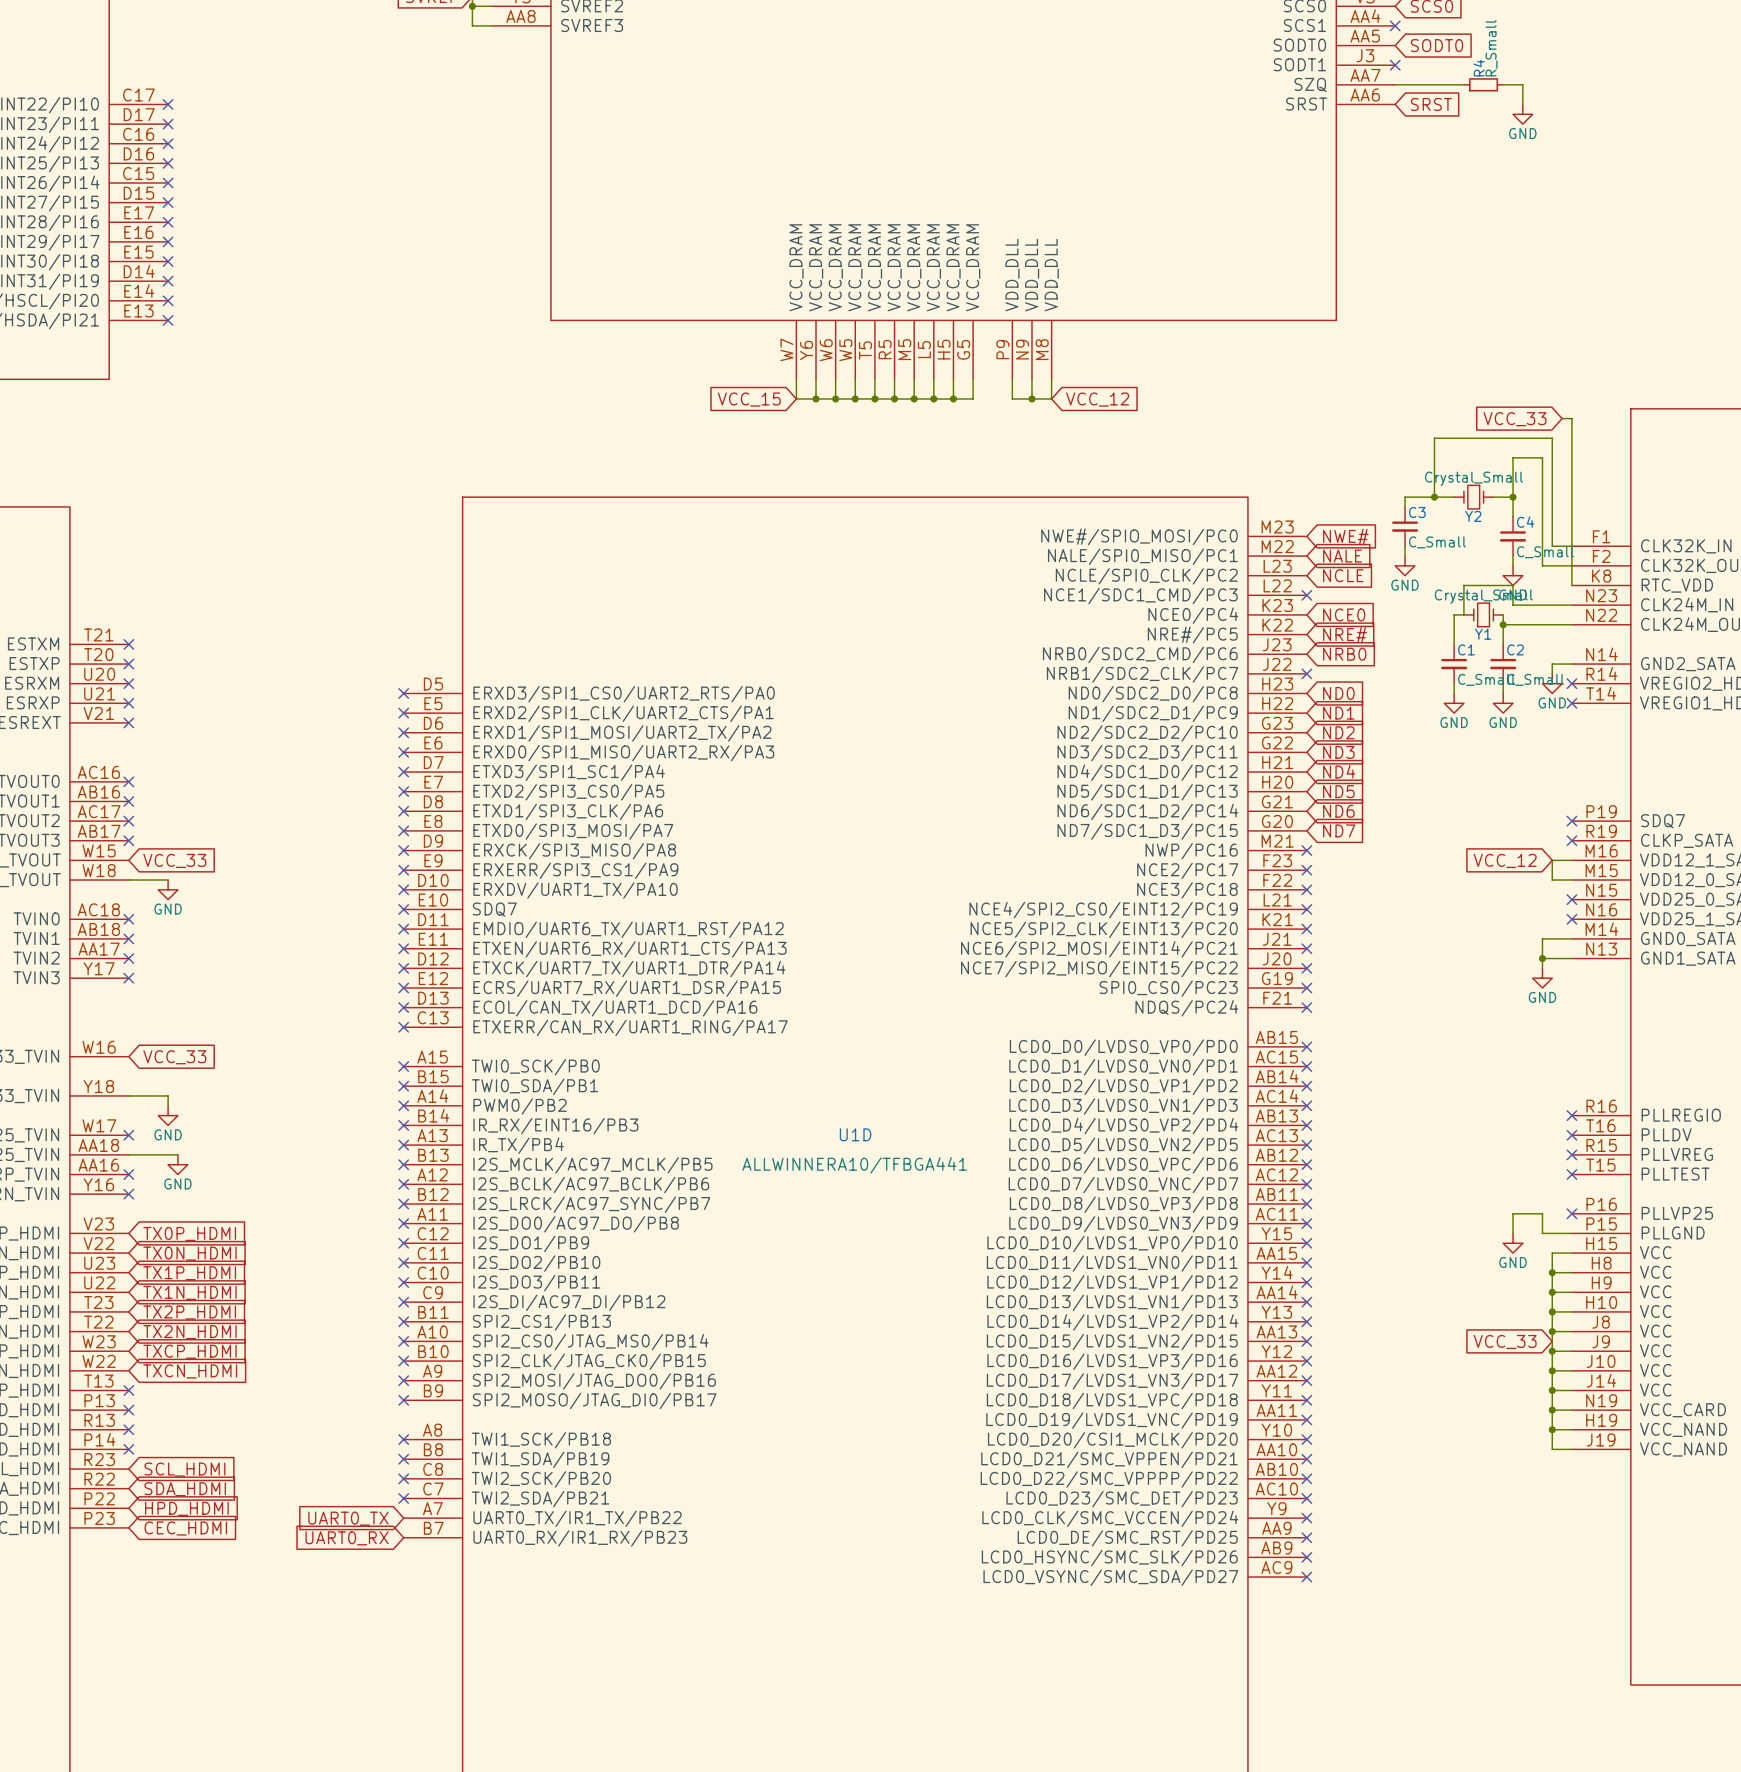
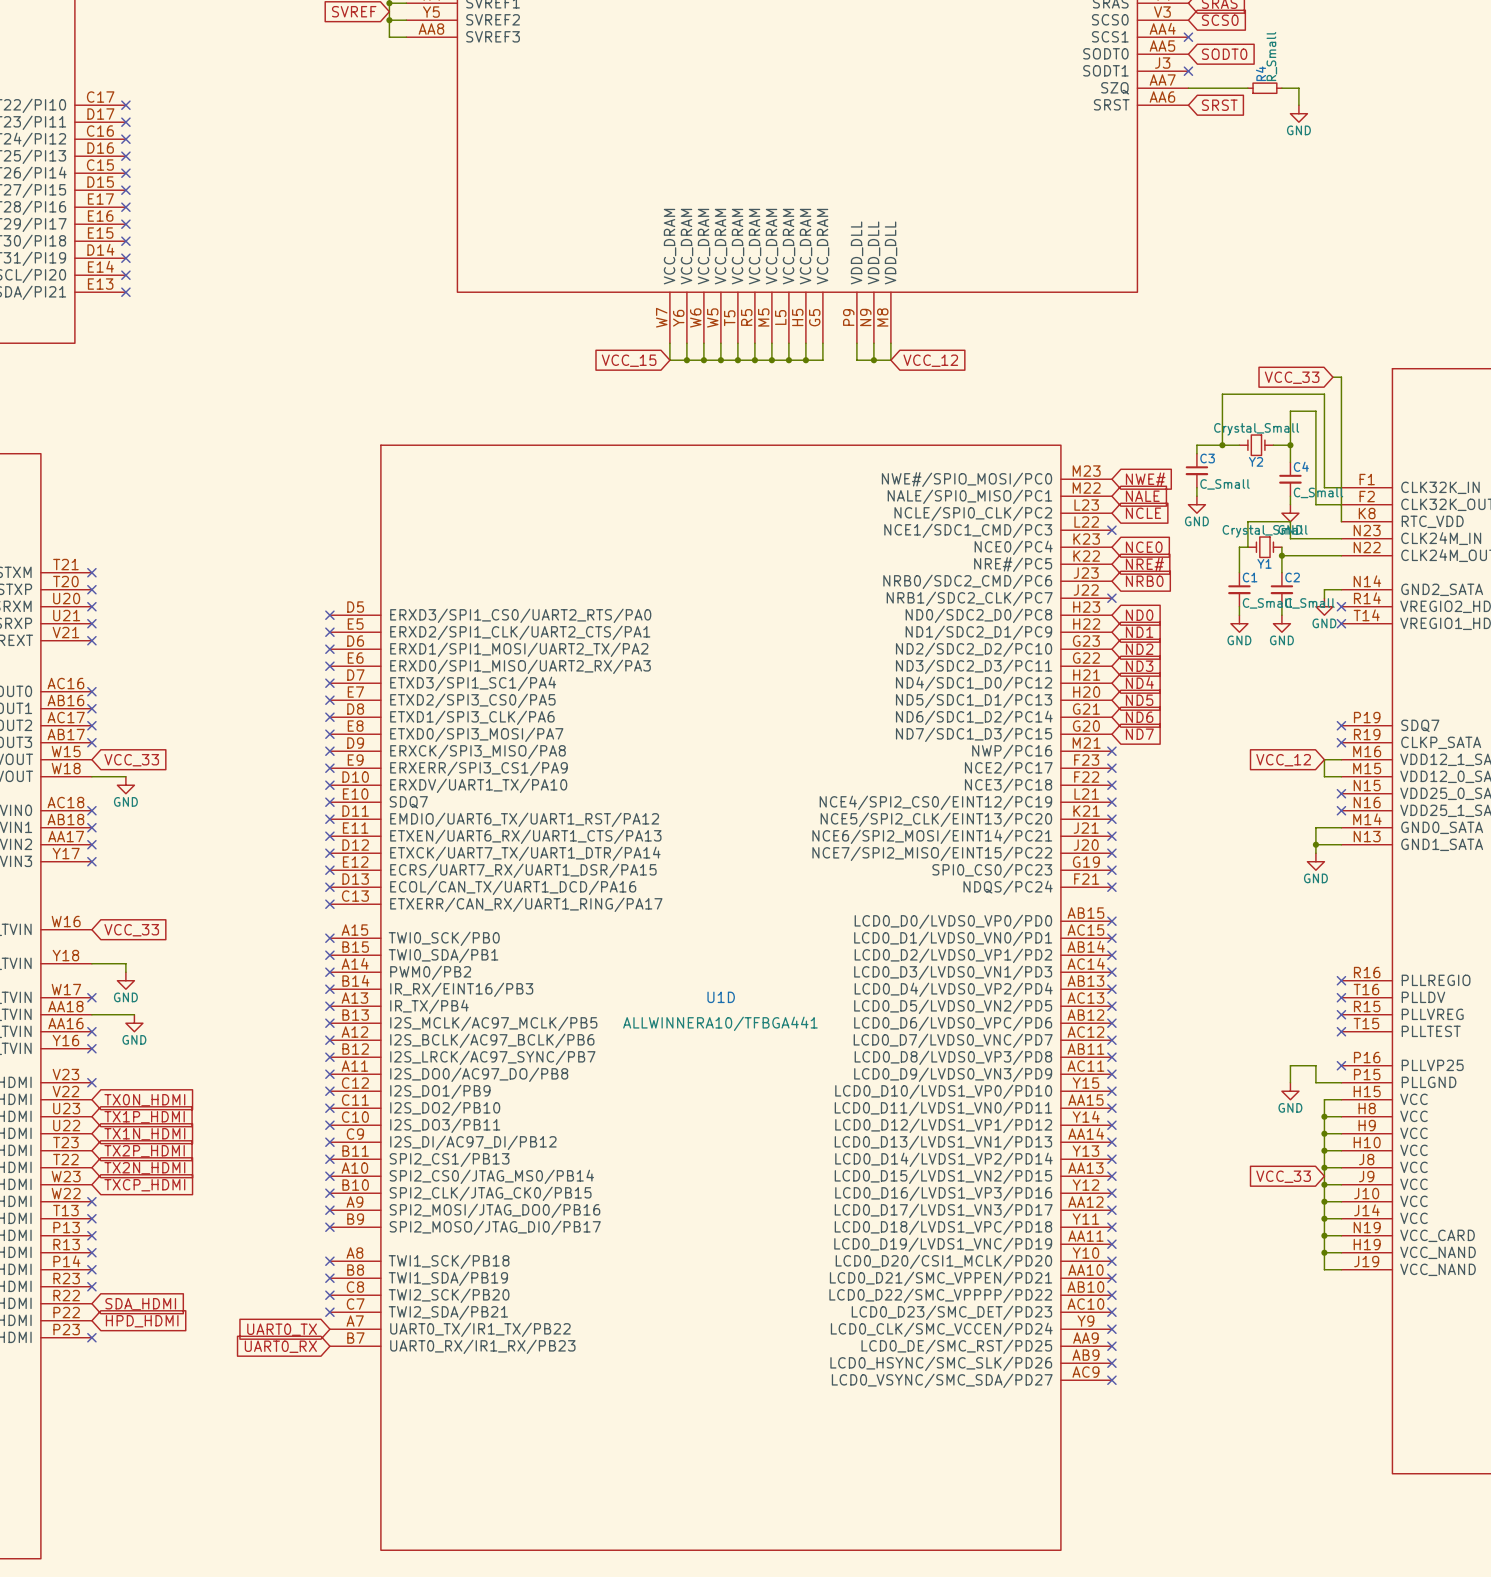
no-connect mark: none -> (91, 1082)
global label: TX0P_HDMI (189, 1233) -> none
no-connect mark: none -> (91, 1201)
global label: TXCN_HDMI (190, 1371) -> none
no-connect mark: none -> (91, 1286)
global label: SCL_HDMI (184, 1469) -> none
no-connect mark: none -> (91, 1337)
global label: CEC_HDMI (185, 1528) -> none

